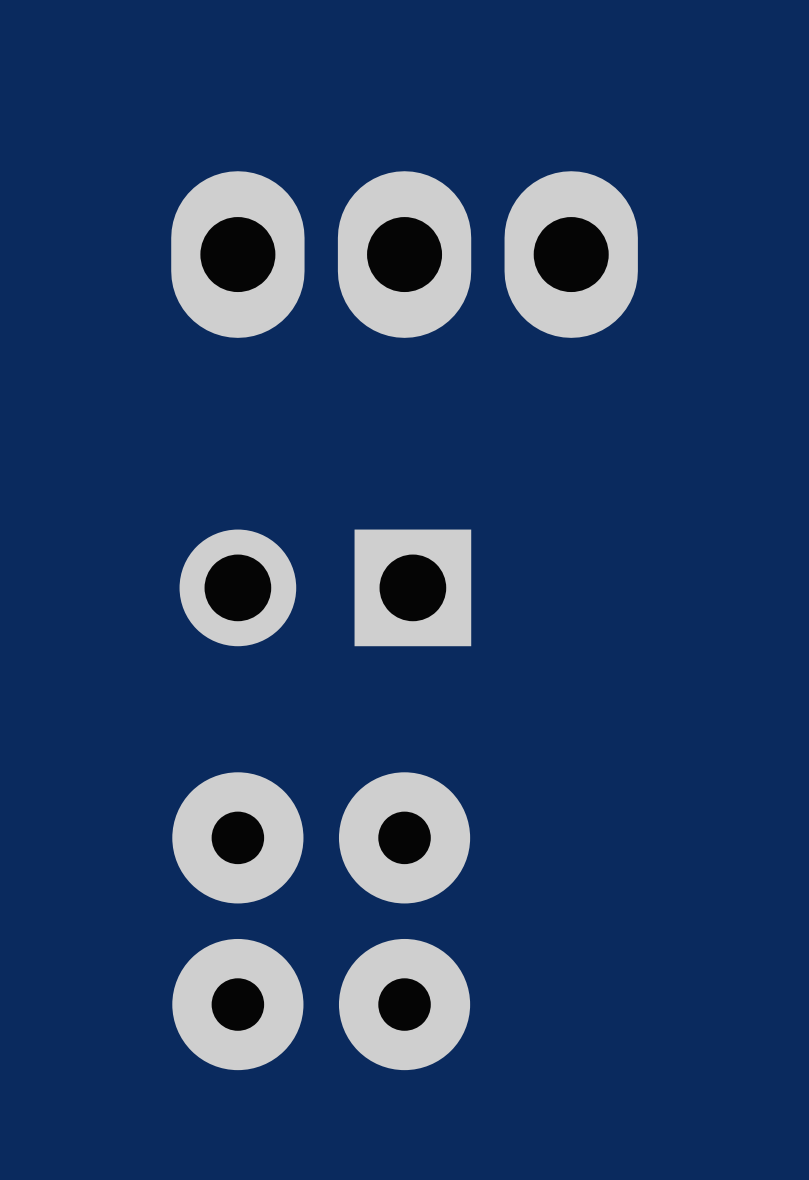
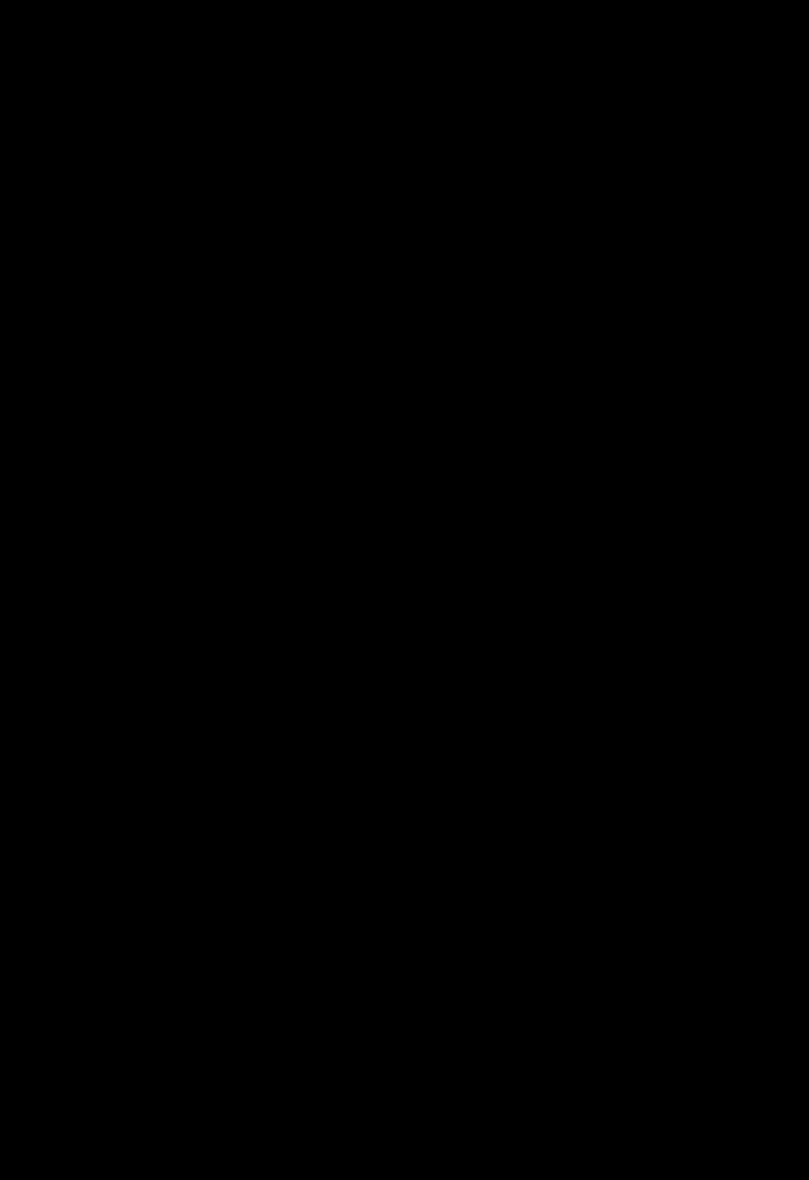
part: (404, 254) -> none
part: (325, 587) -> none
part: (237, 921) -> none
part: (404, 921) -> none

